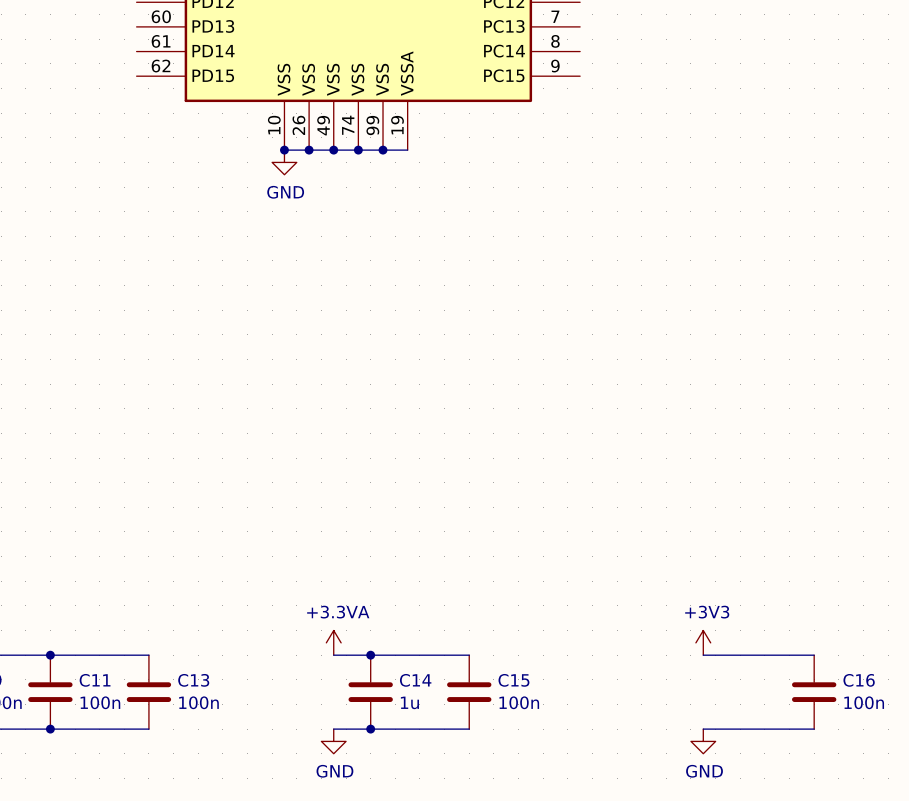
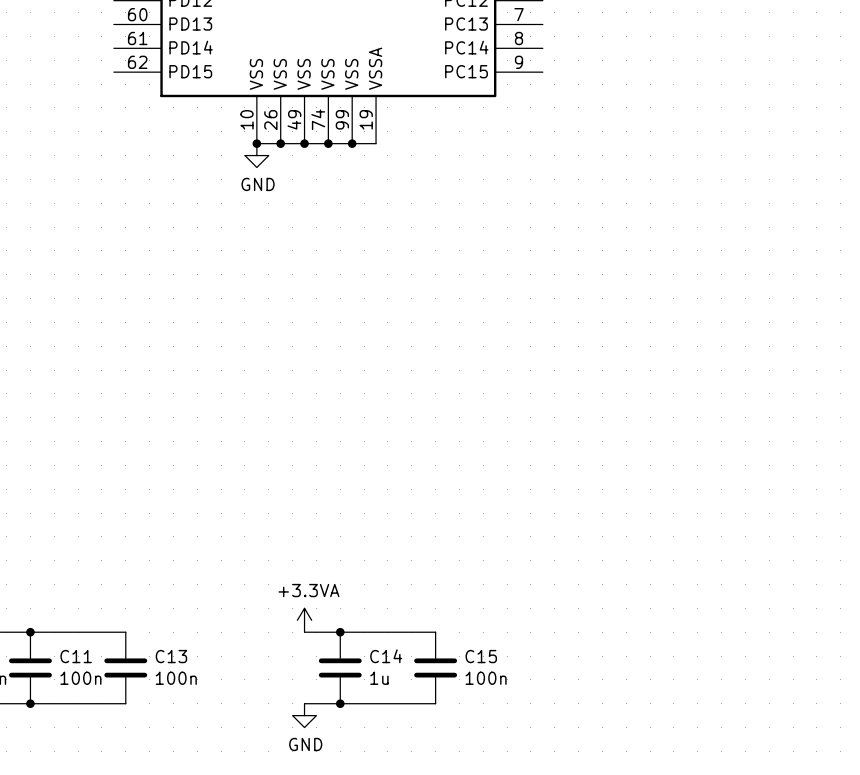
power symbol: +3V3 (703, 642) -> none
wire: (703, 655) (814, 655) -> none
C16: 100n (814, 692) -> none
wire: (703, 729) (814, 729) -> none
power symbol: GND (703, 741) -> none

